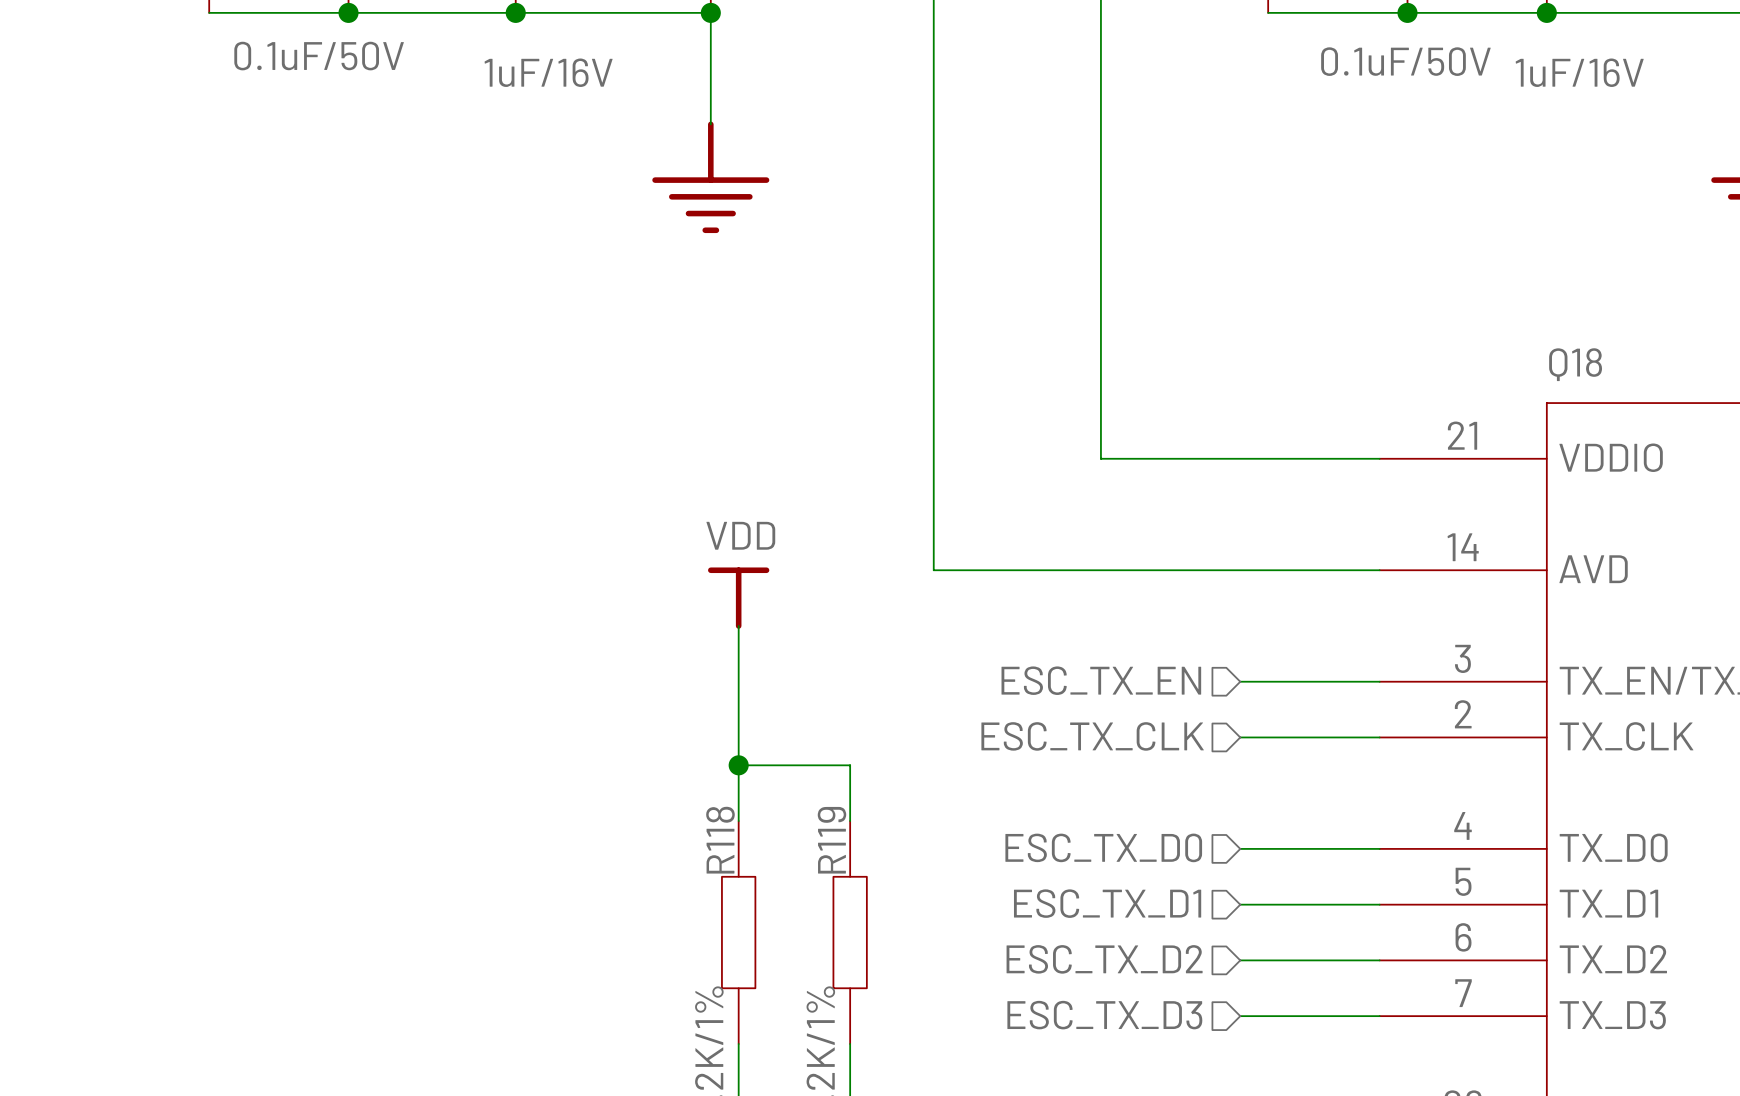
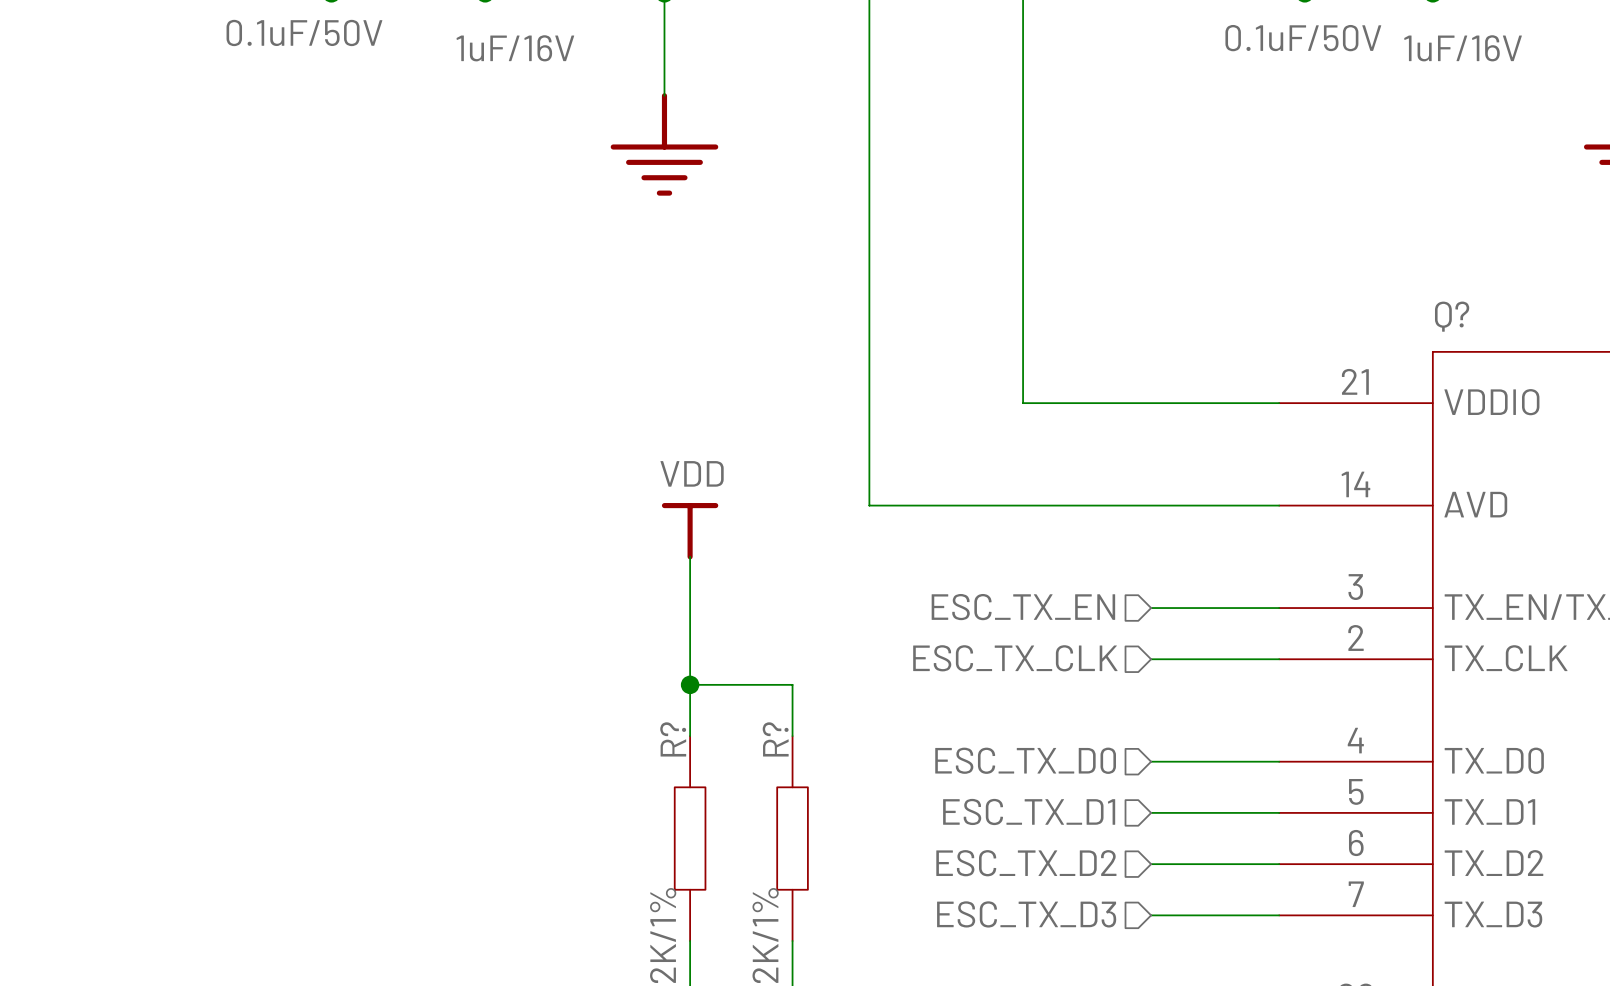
Q18 name: Q18 (1575, 364) -> Q? (1452, 316)
R118 name: R118 (720, 840) -> R? (673, 739)
R119 name: R119 (831, 840) -> R? (775, 739)

